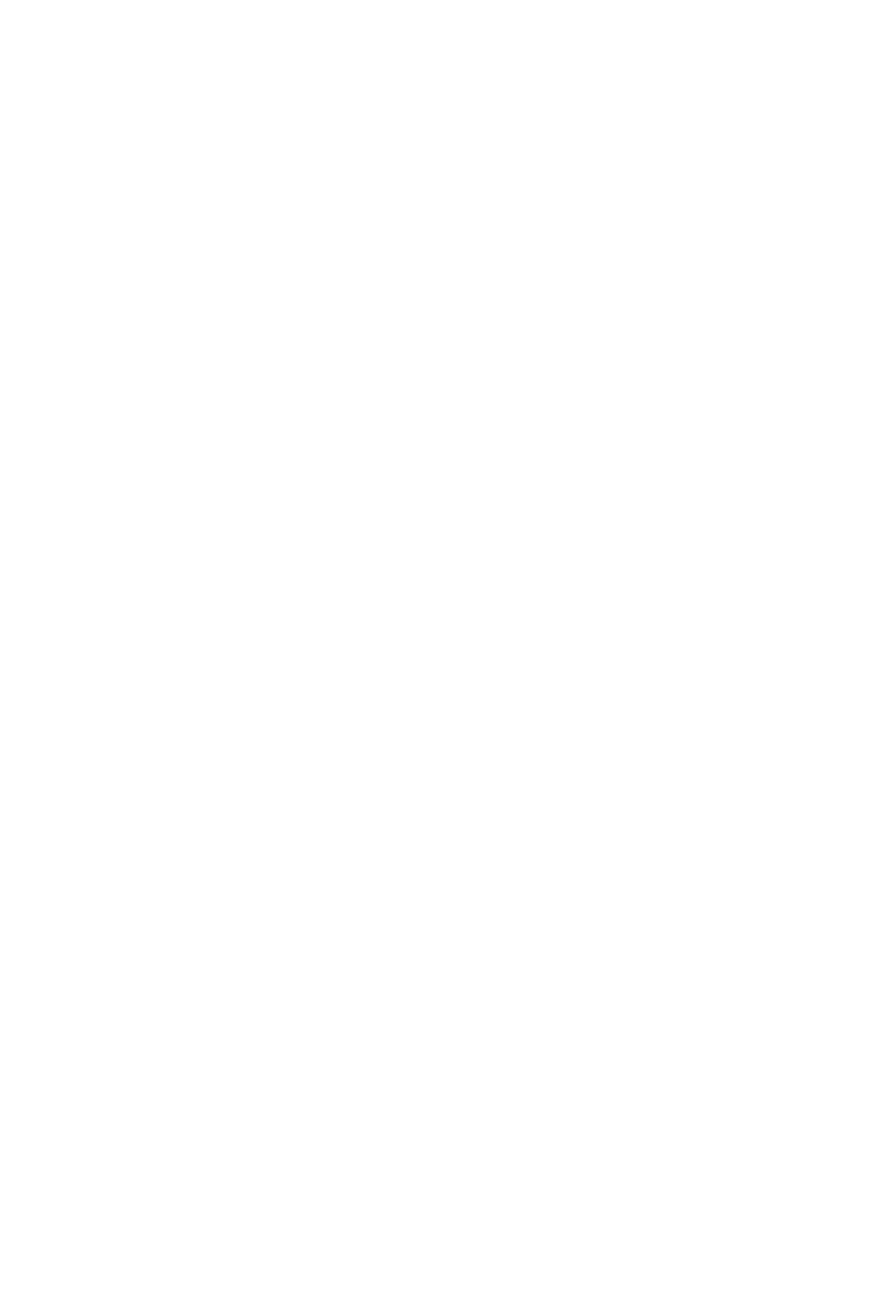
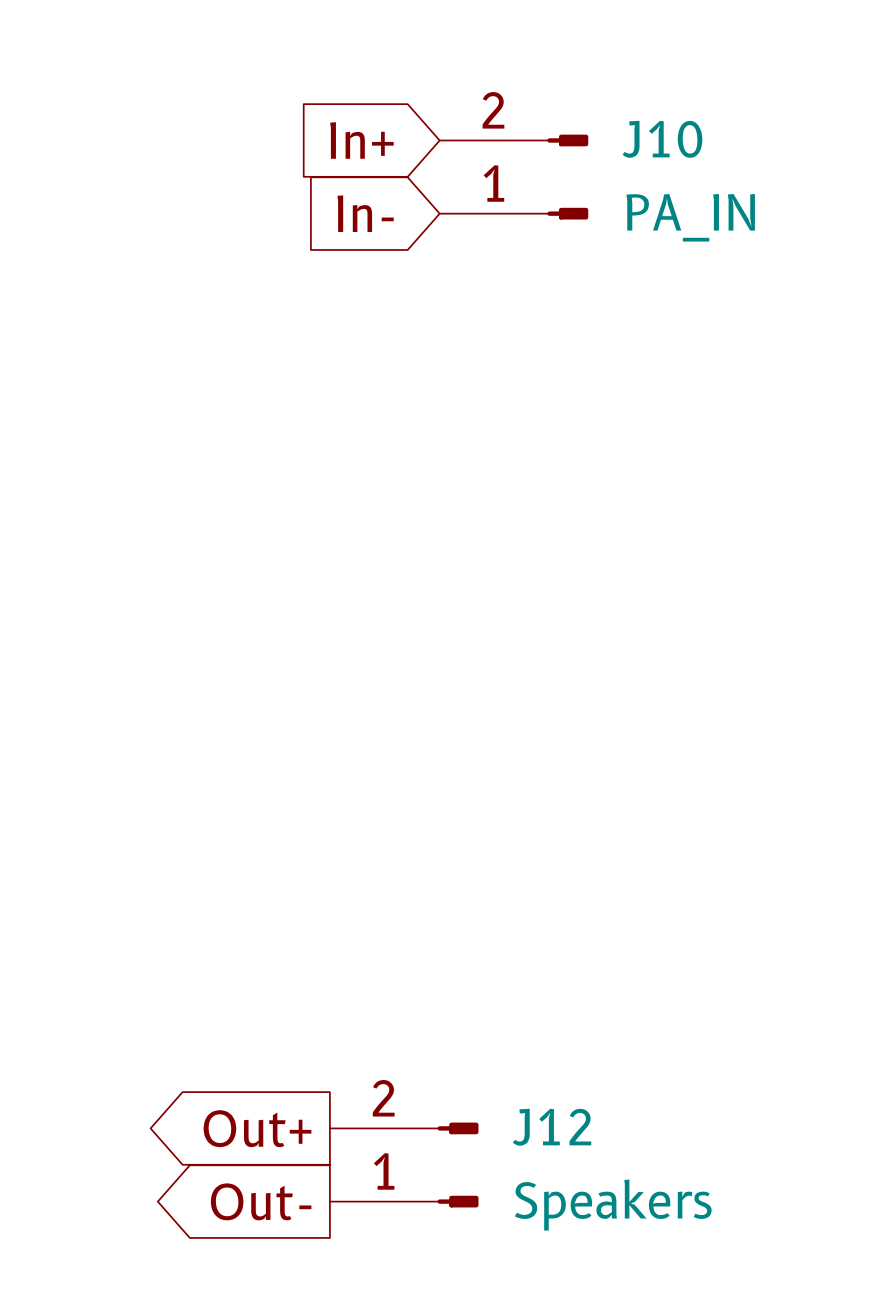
global label: none -> In+ (361, 140)
J10: none -> PA_IN (513, 177)
global label: none -> In- (365, 213)
global label: none -> Out+ (257, 1128)
J12: none -> Speakers (404, 1165)
global label: none -> Out- (261, 1201)

